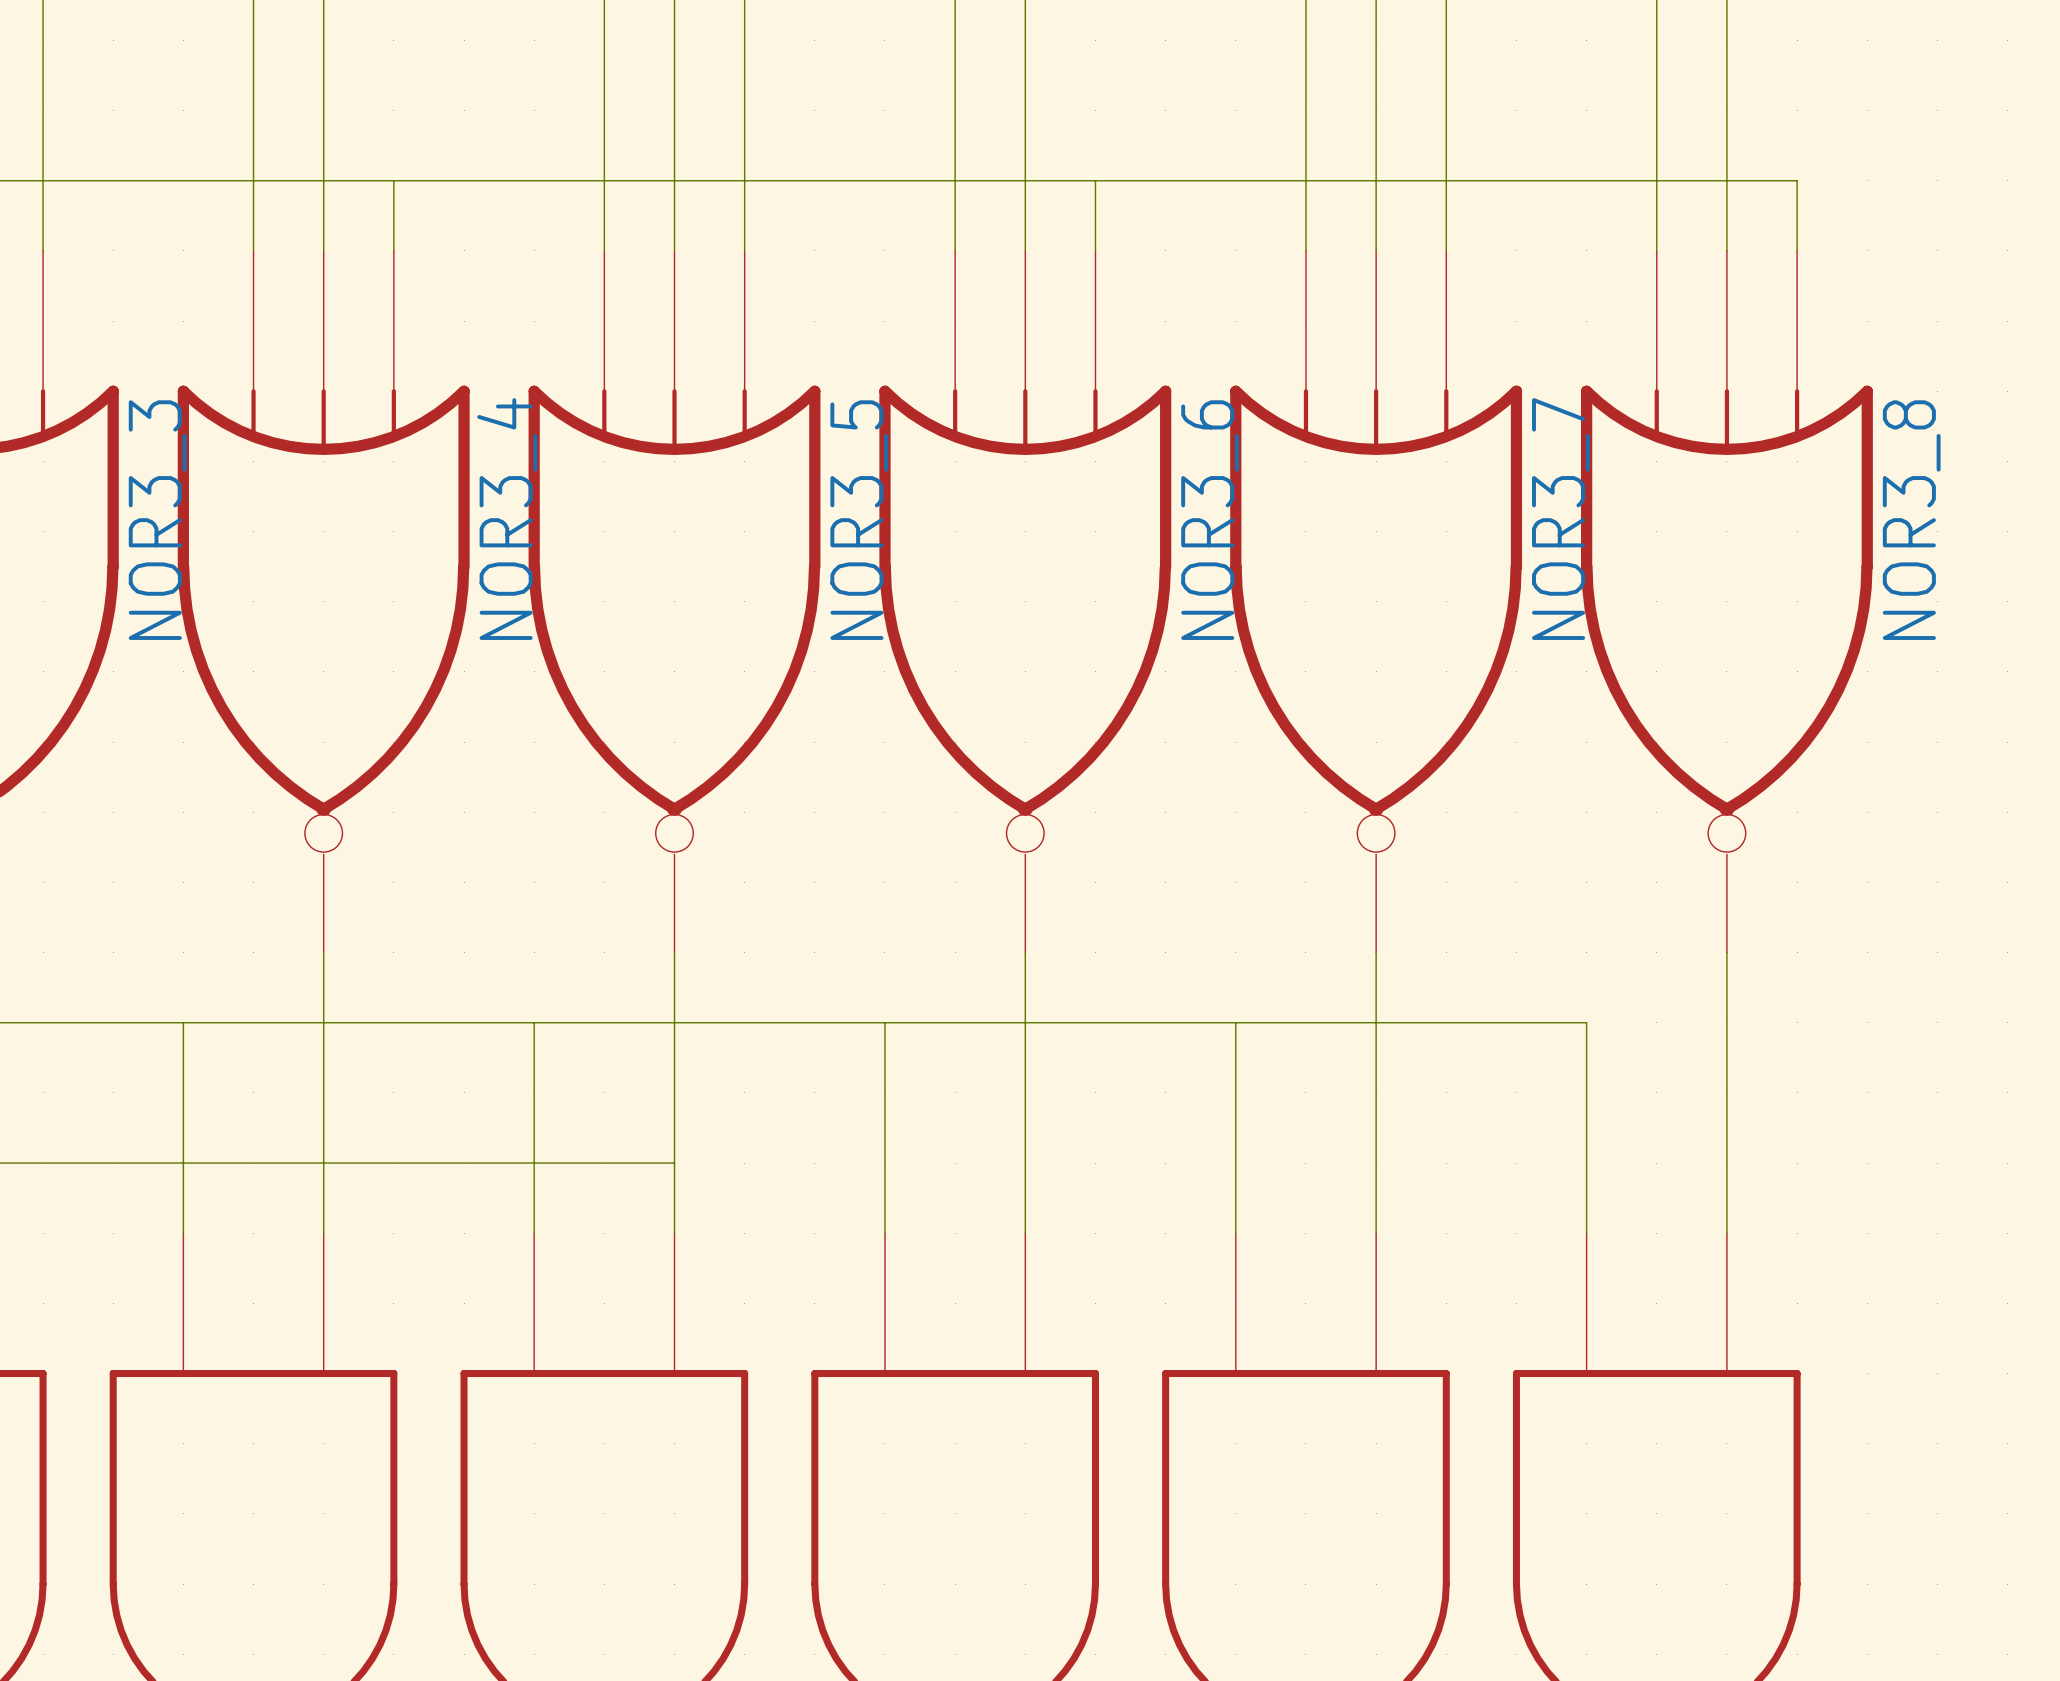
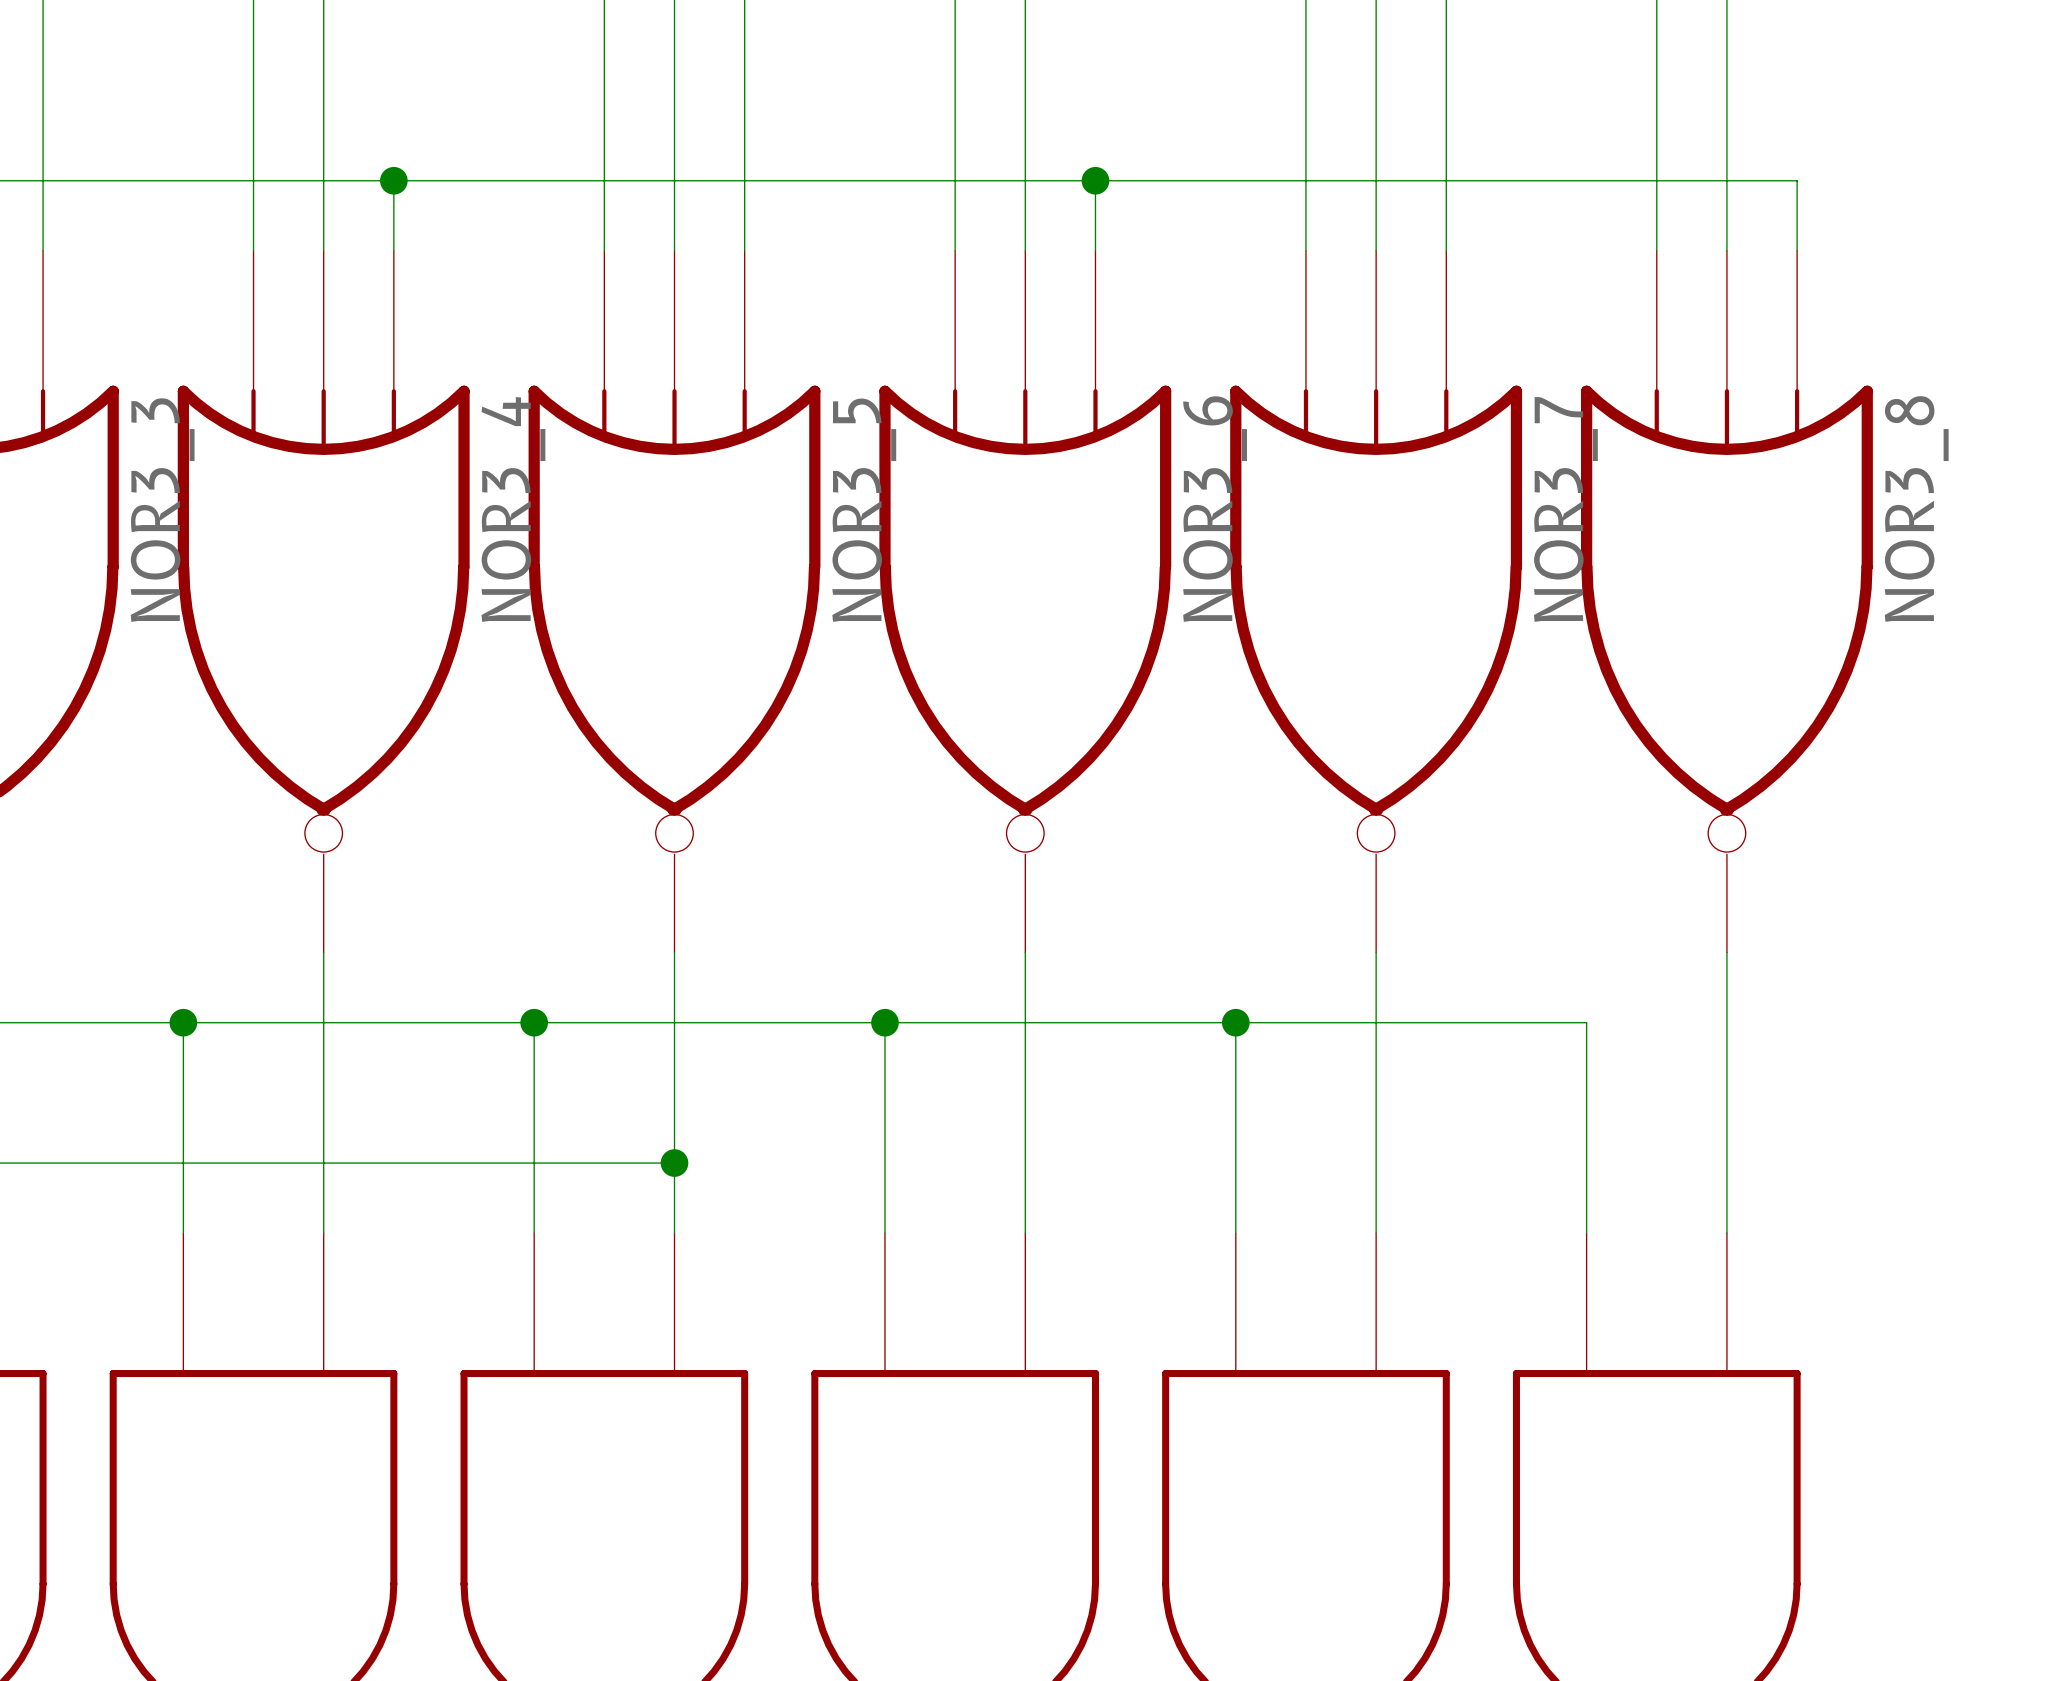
junction: none -> (393, 180)
junction: none -> (1095, 180)
junction: none -> (183, 1022)
junction: none -> (534, 1022)
junction: none -> (884, 1022)
junction: none -> (1235, 1022)
junction: none -> (674, 1163)

